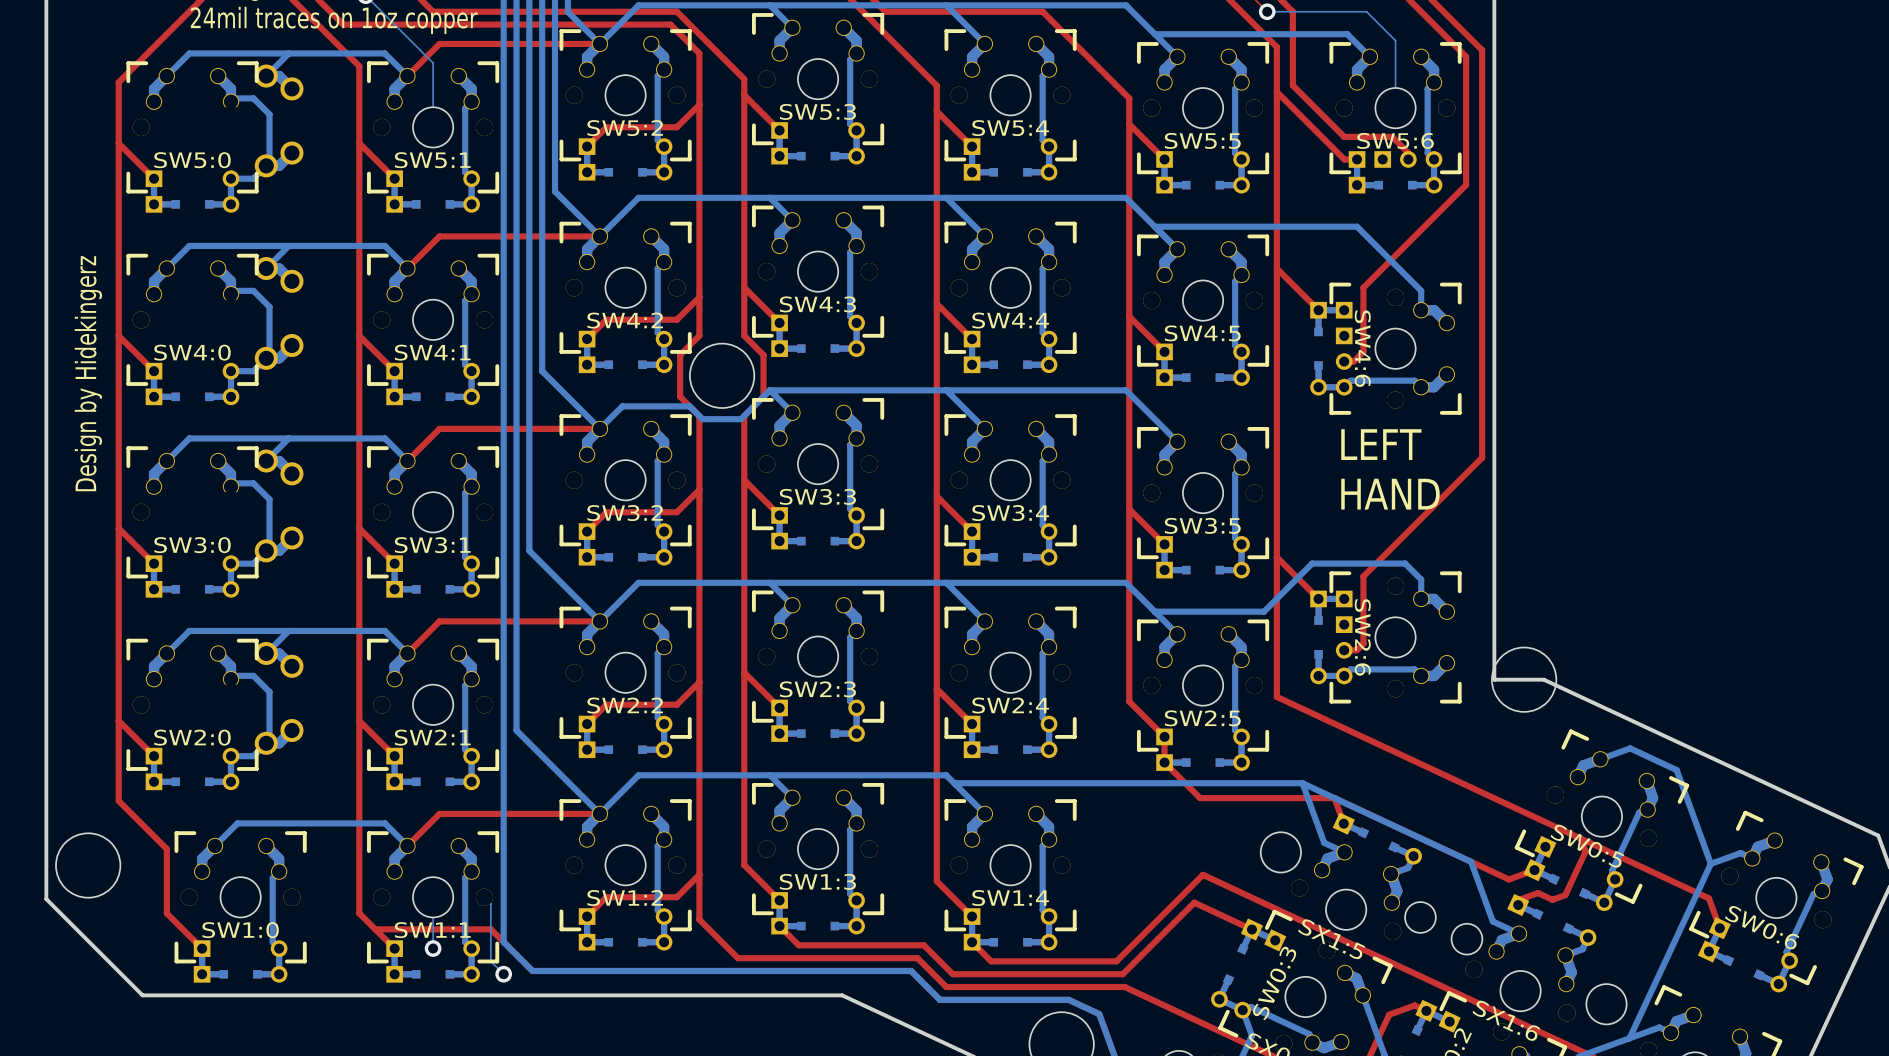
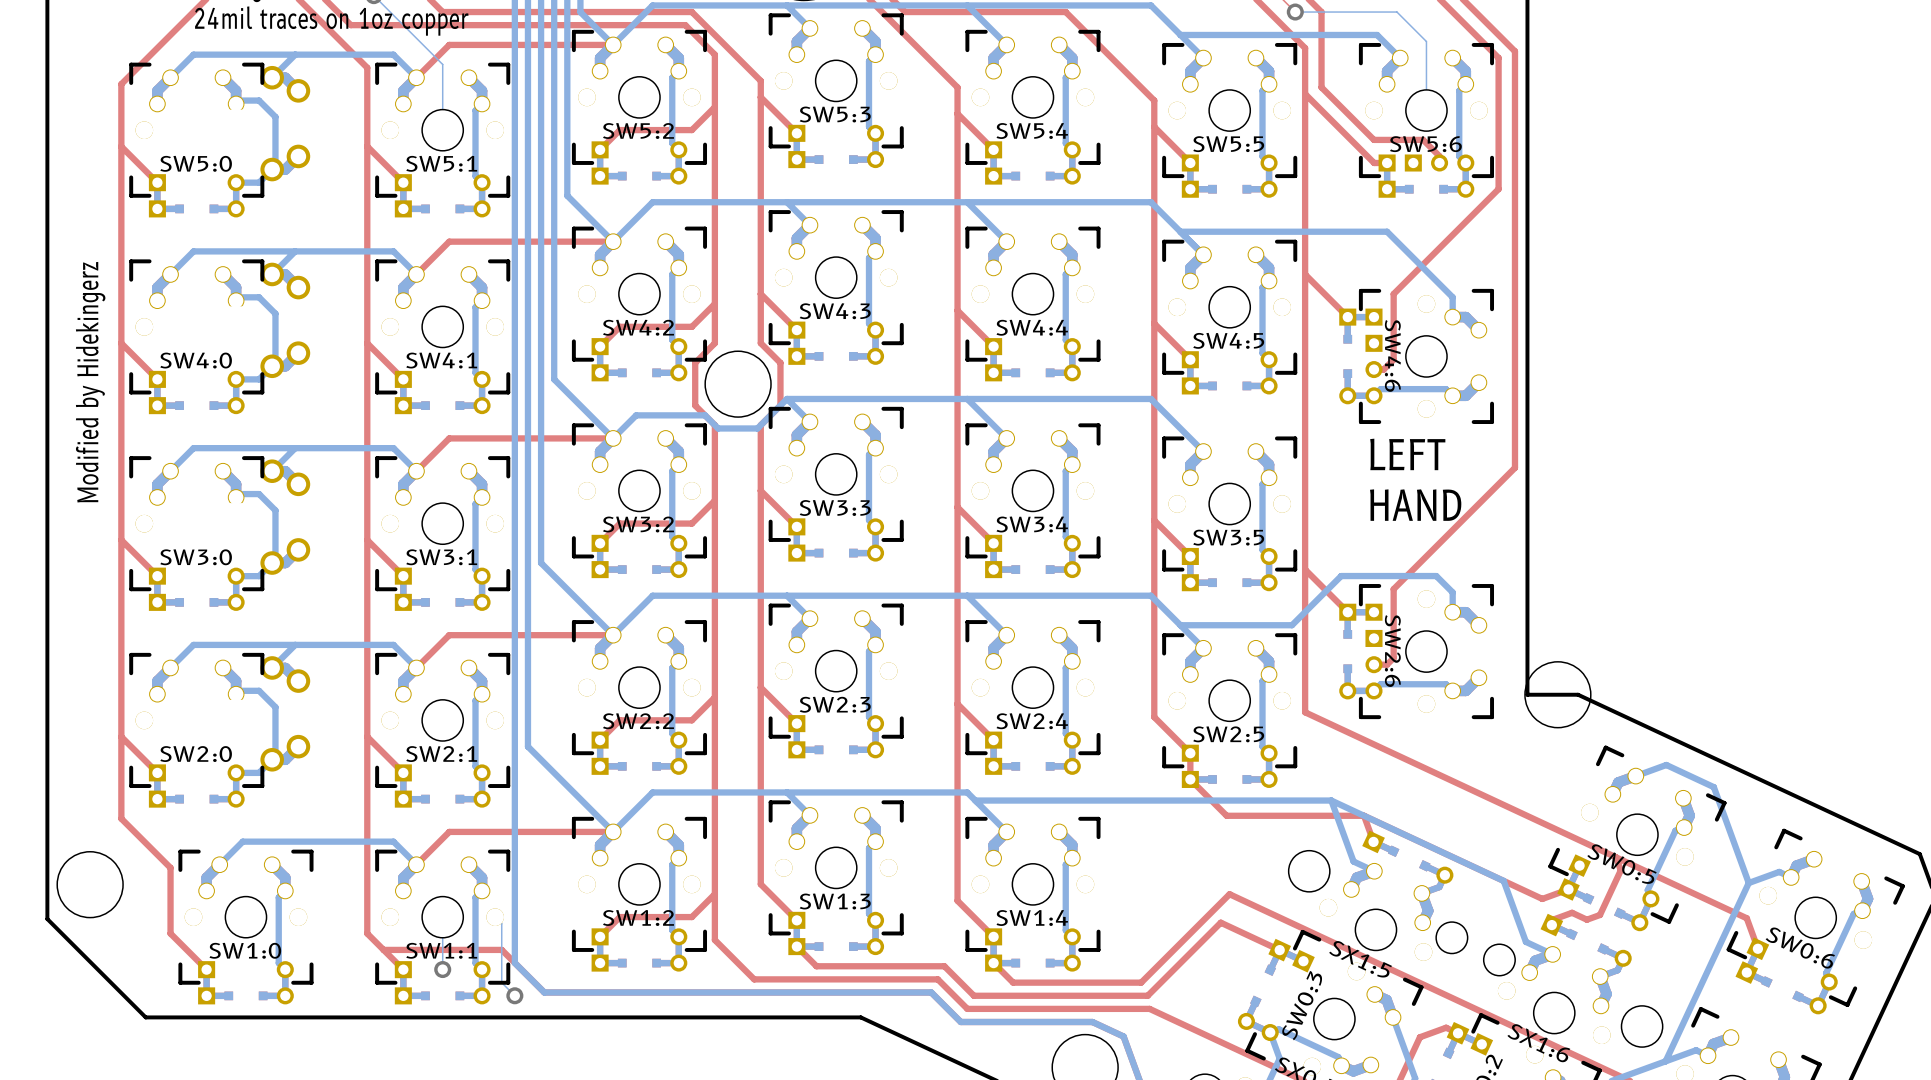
text: Design by Hidekingerz (88, 373) -> Modified by Hidekingerz (90, 382)

